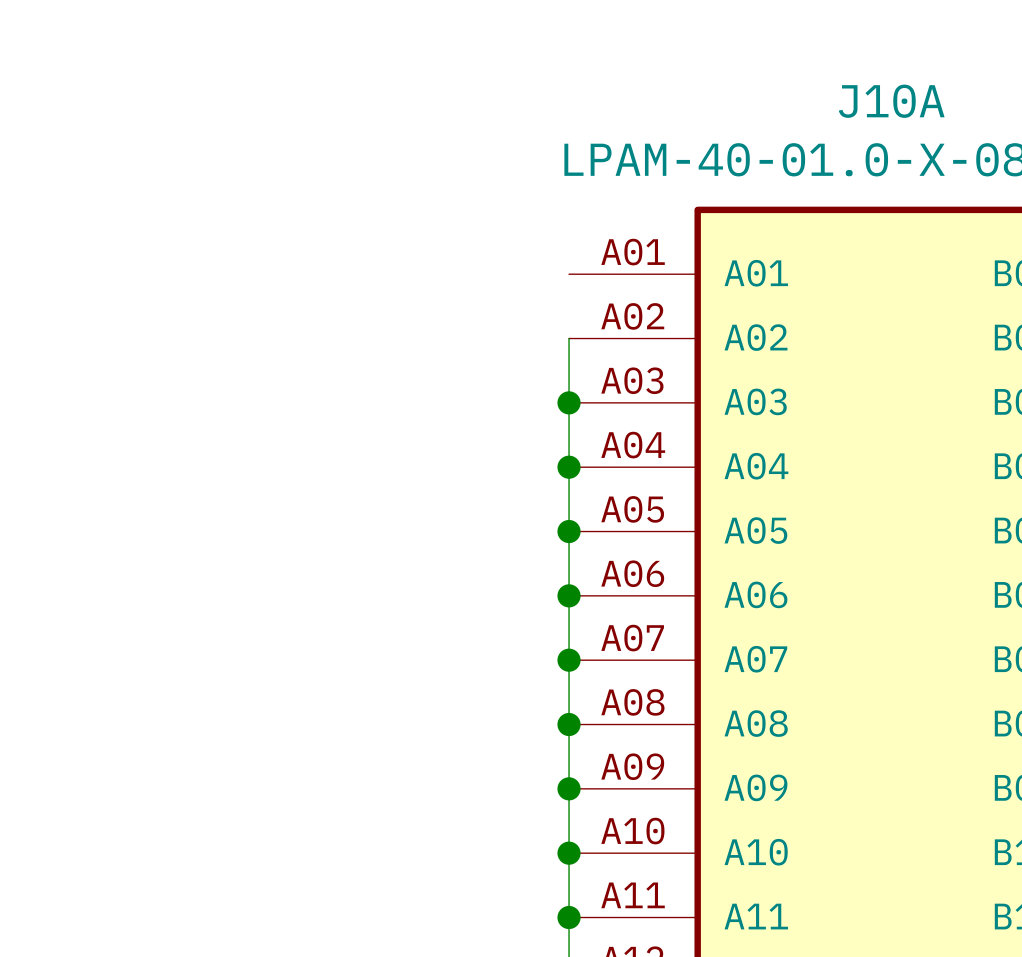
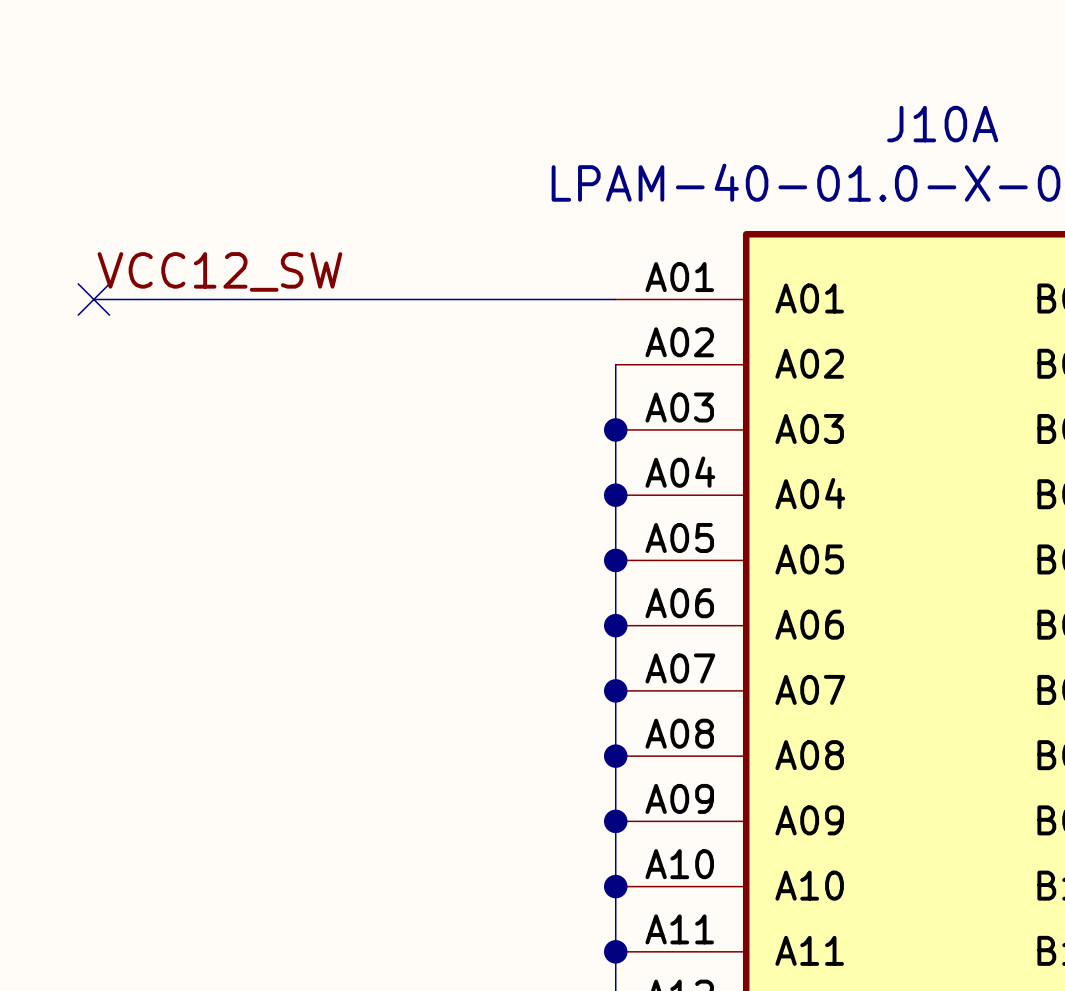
label: none -> VCC12_SW (219, 271)
wire: none -> (93, 299) (615, 299)
no-connect mark: none -> (93, 299)

